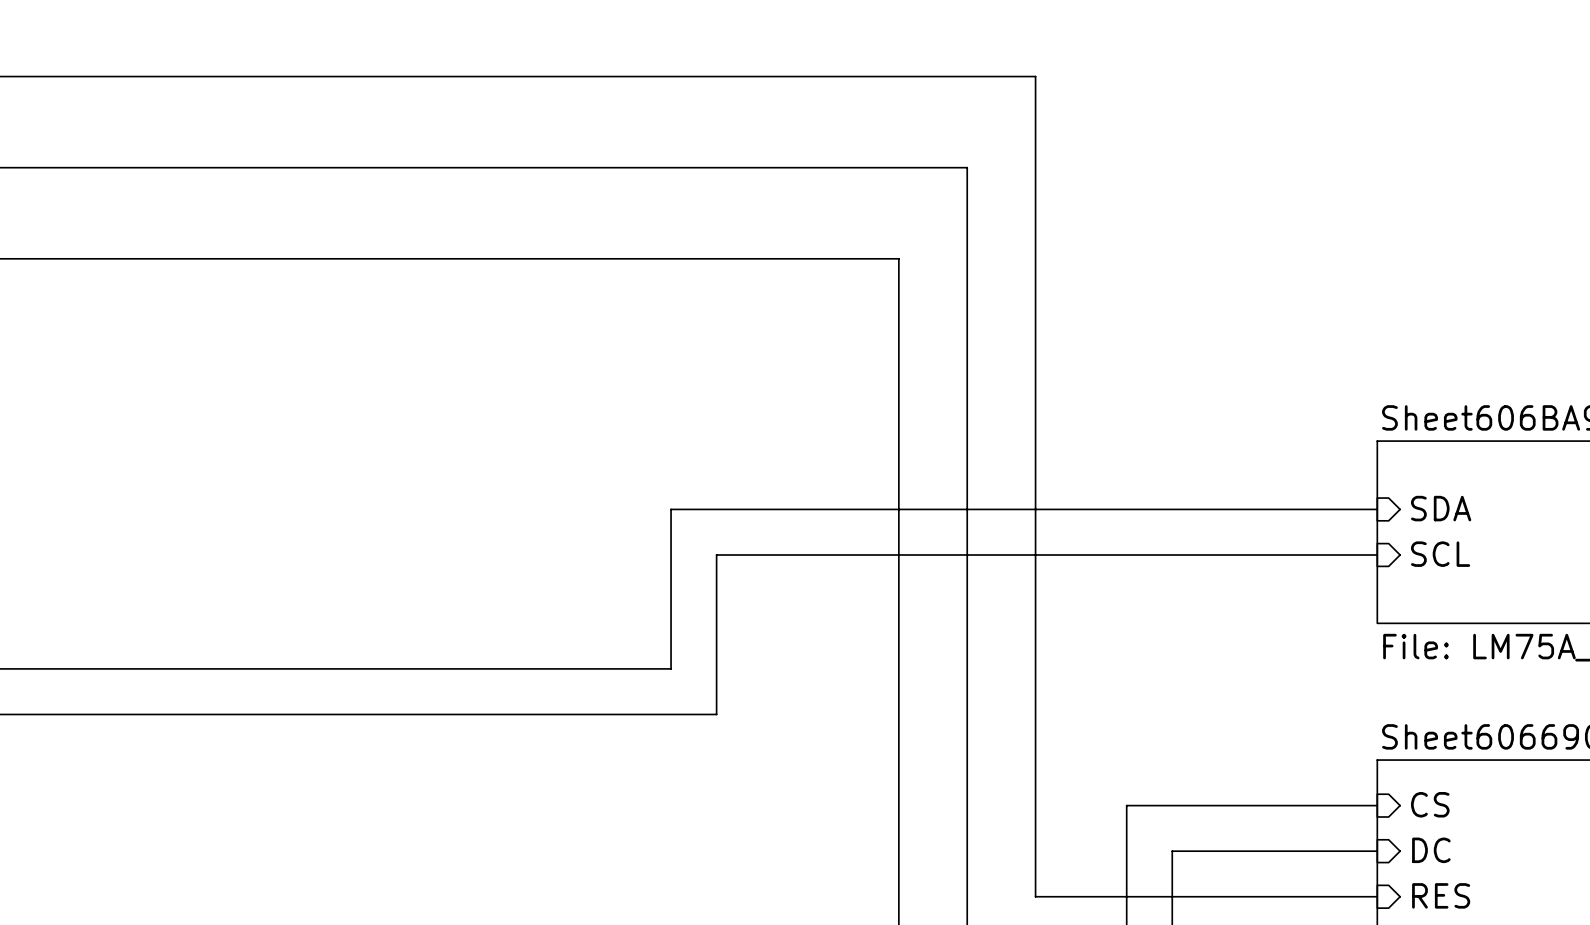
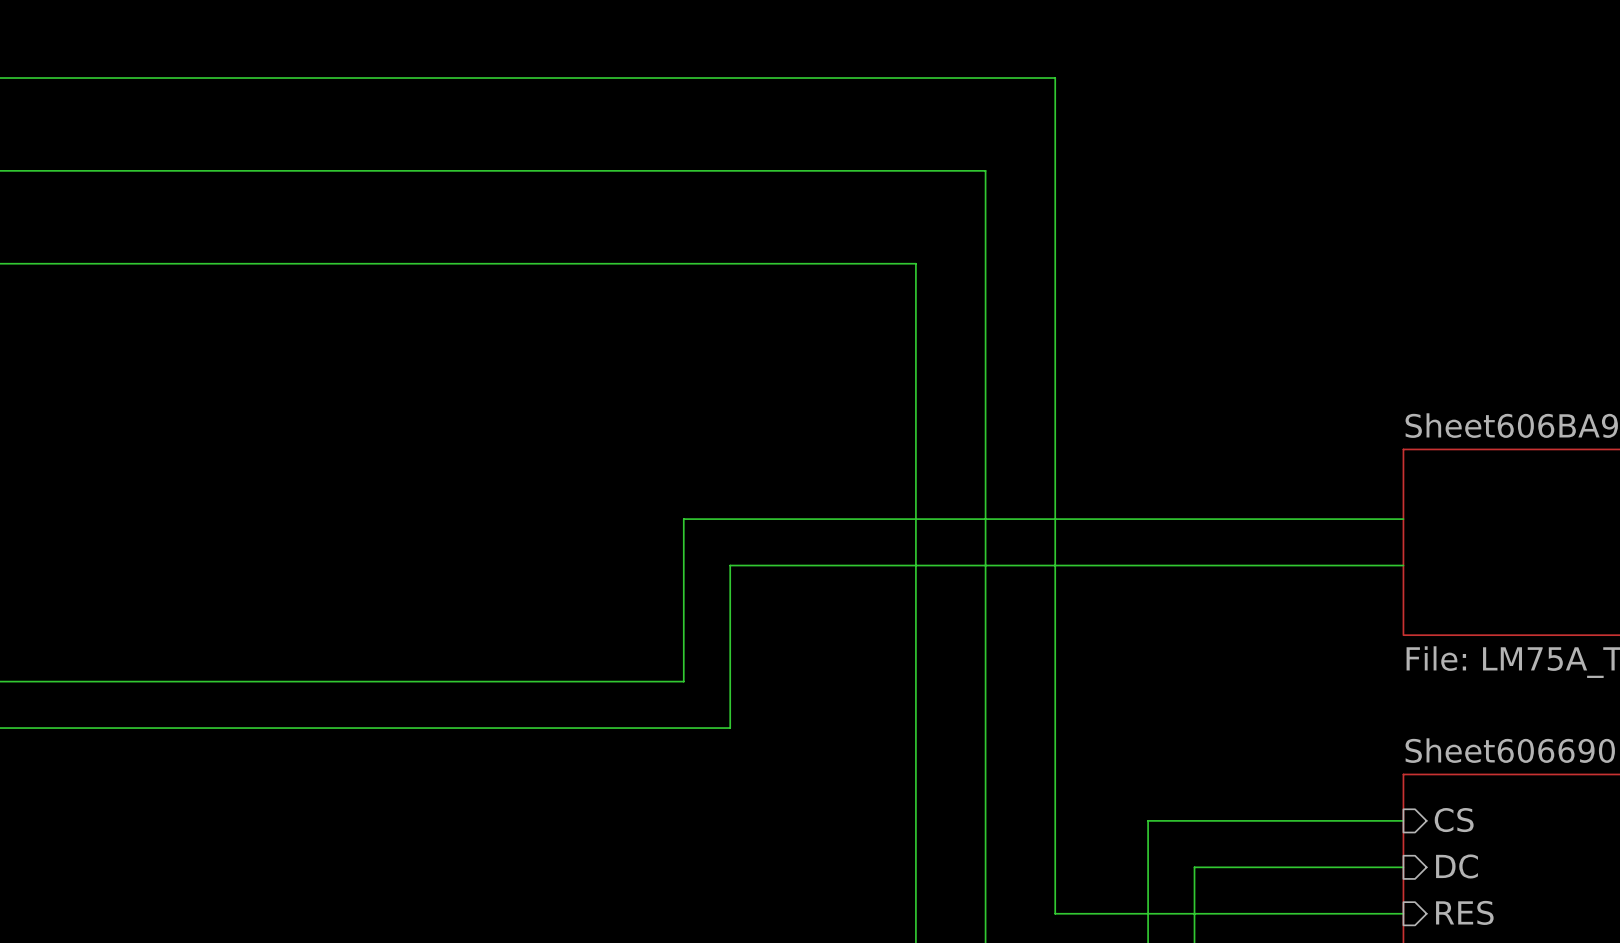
sheet pin: SDA (1441, 508) -> none
sheet pin: SCL (1440, 554) -> none

